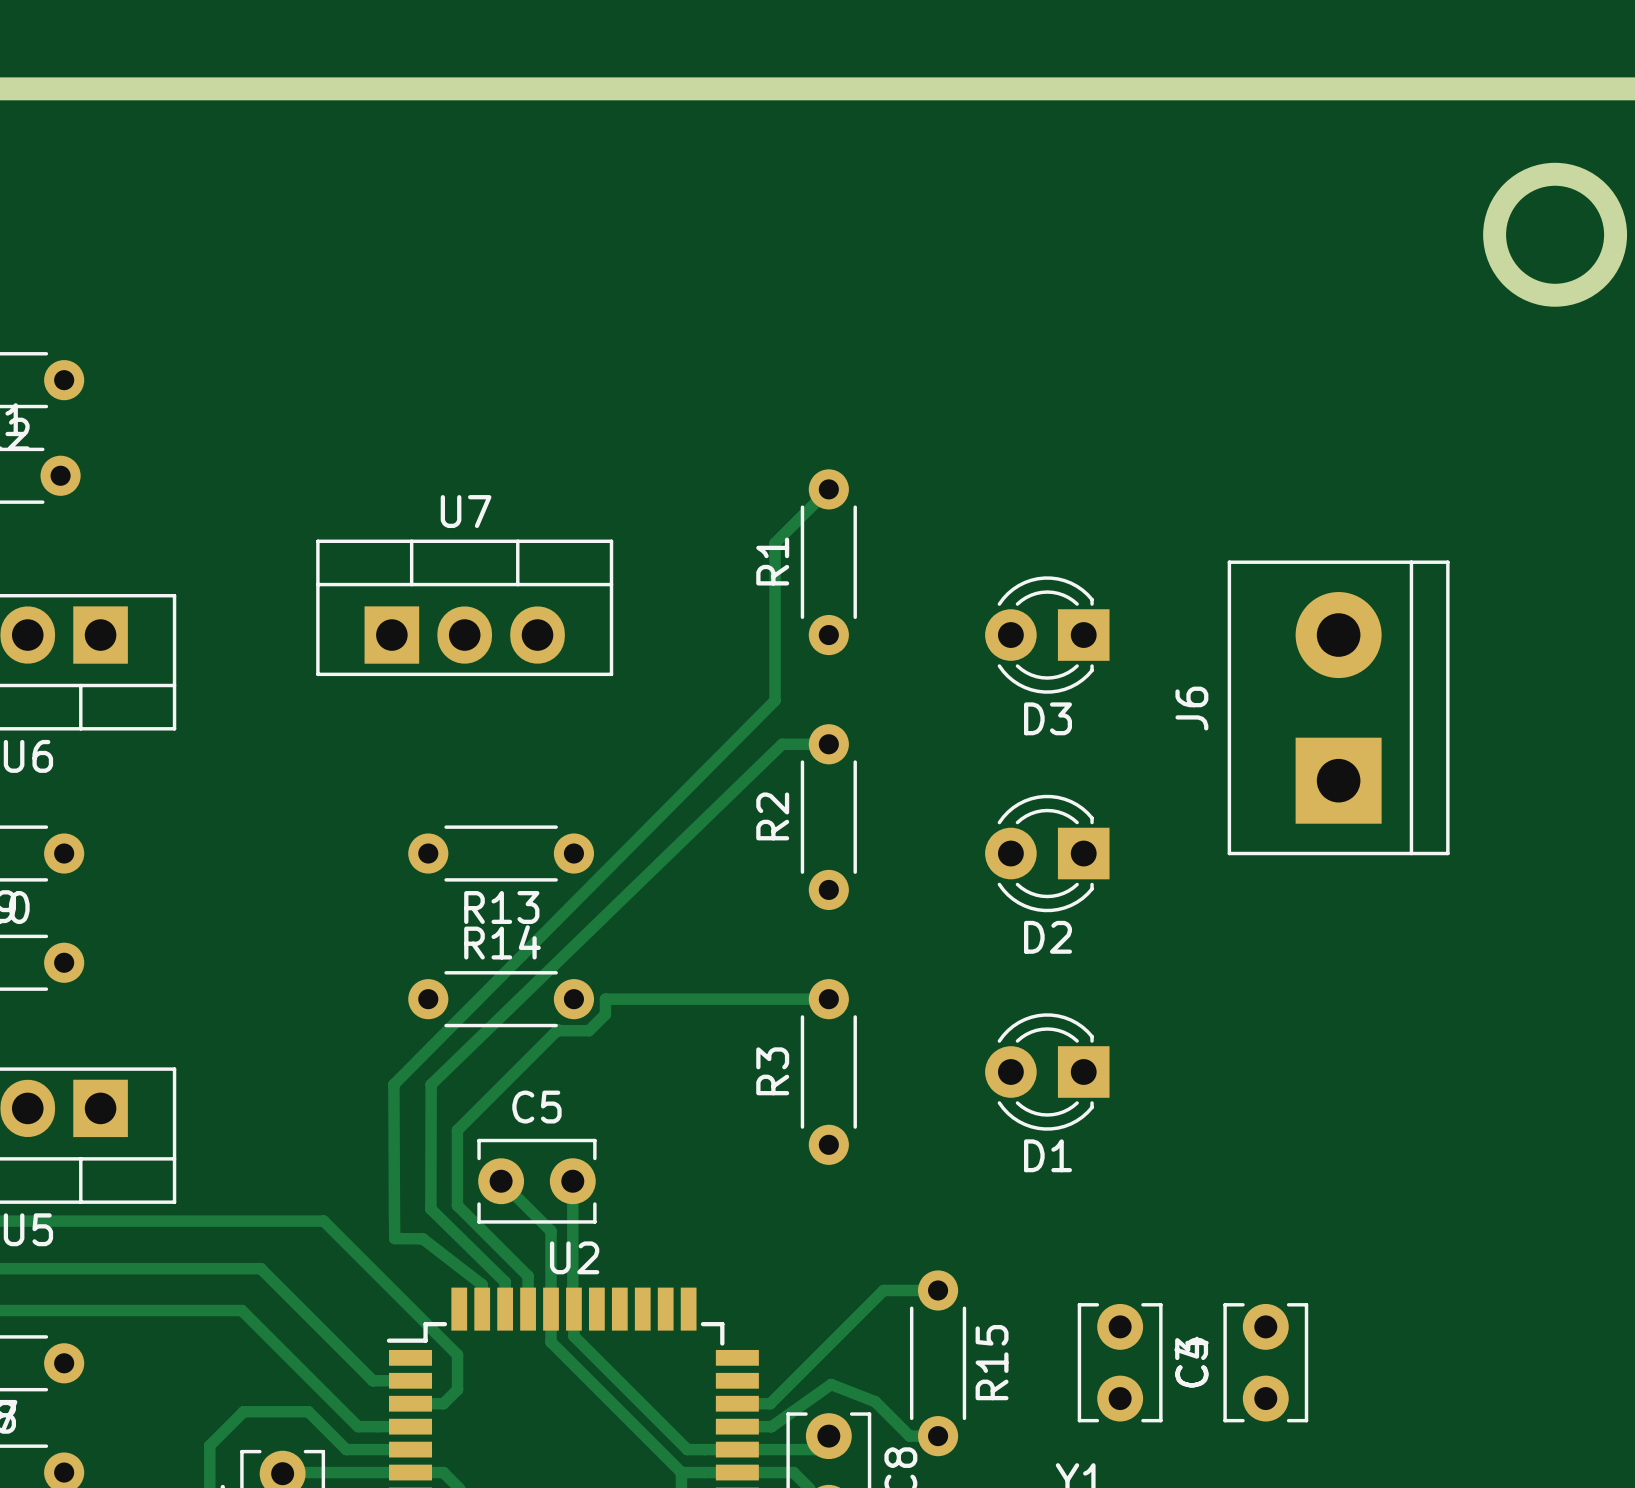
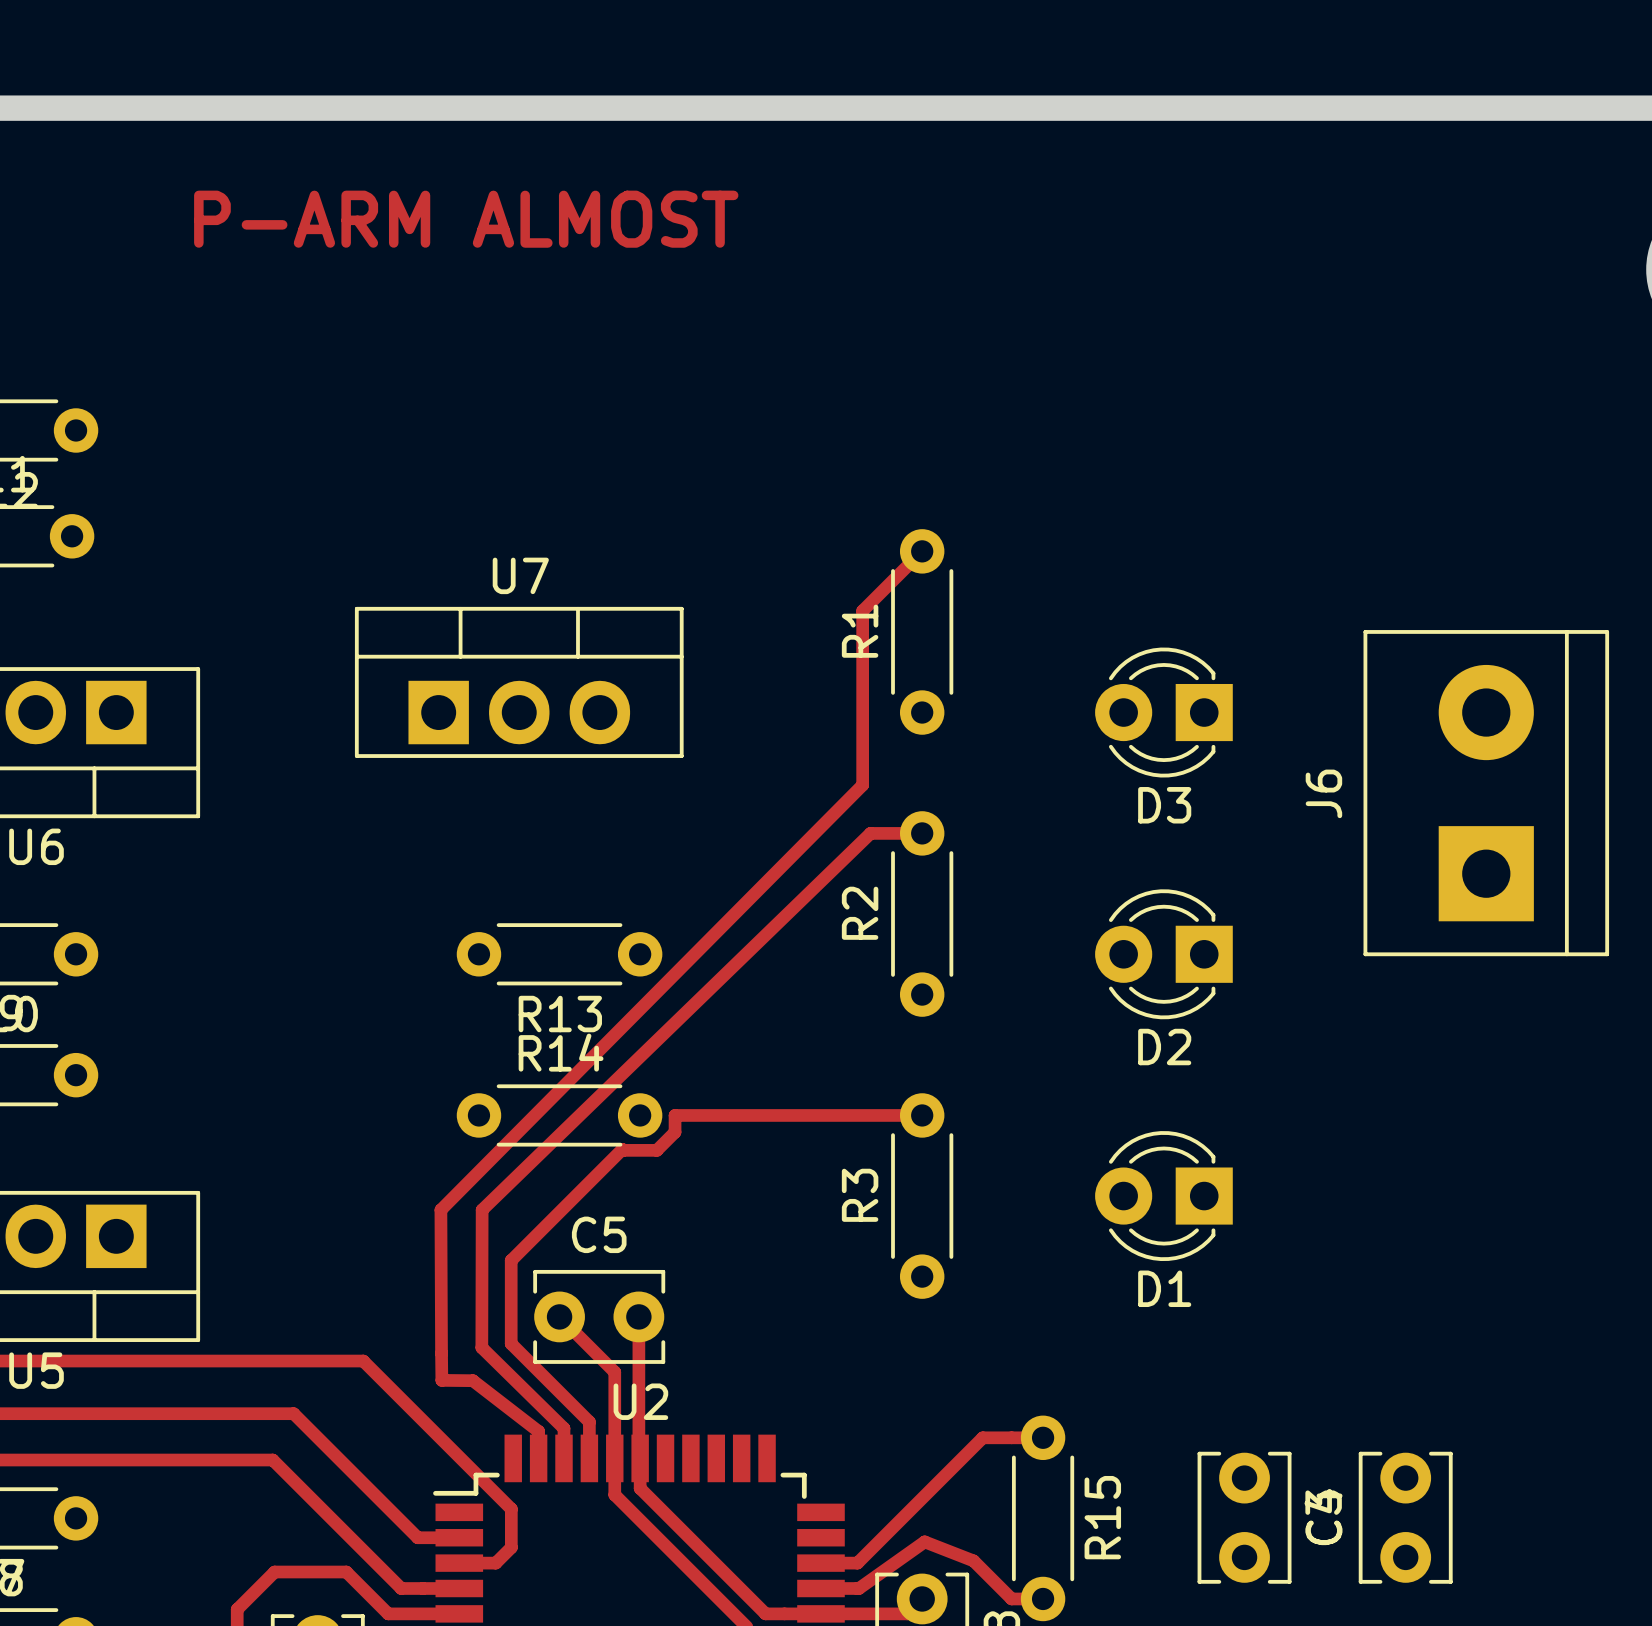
text: none -> P-ARM ALMOST (466, 219)

